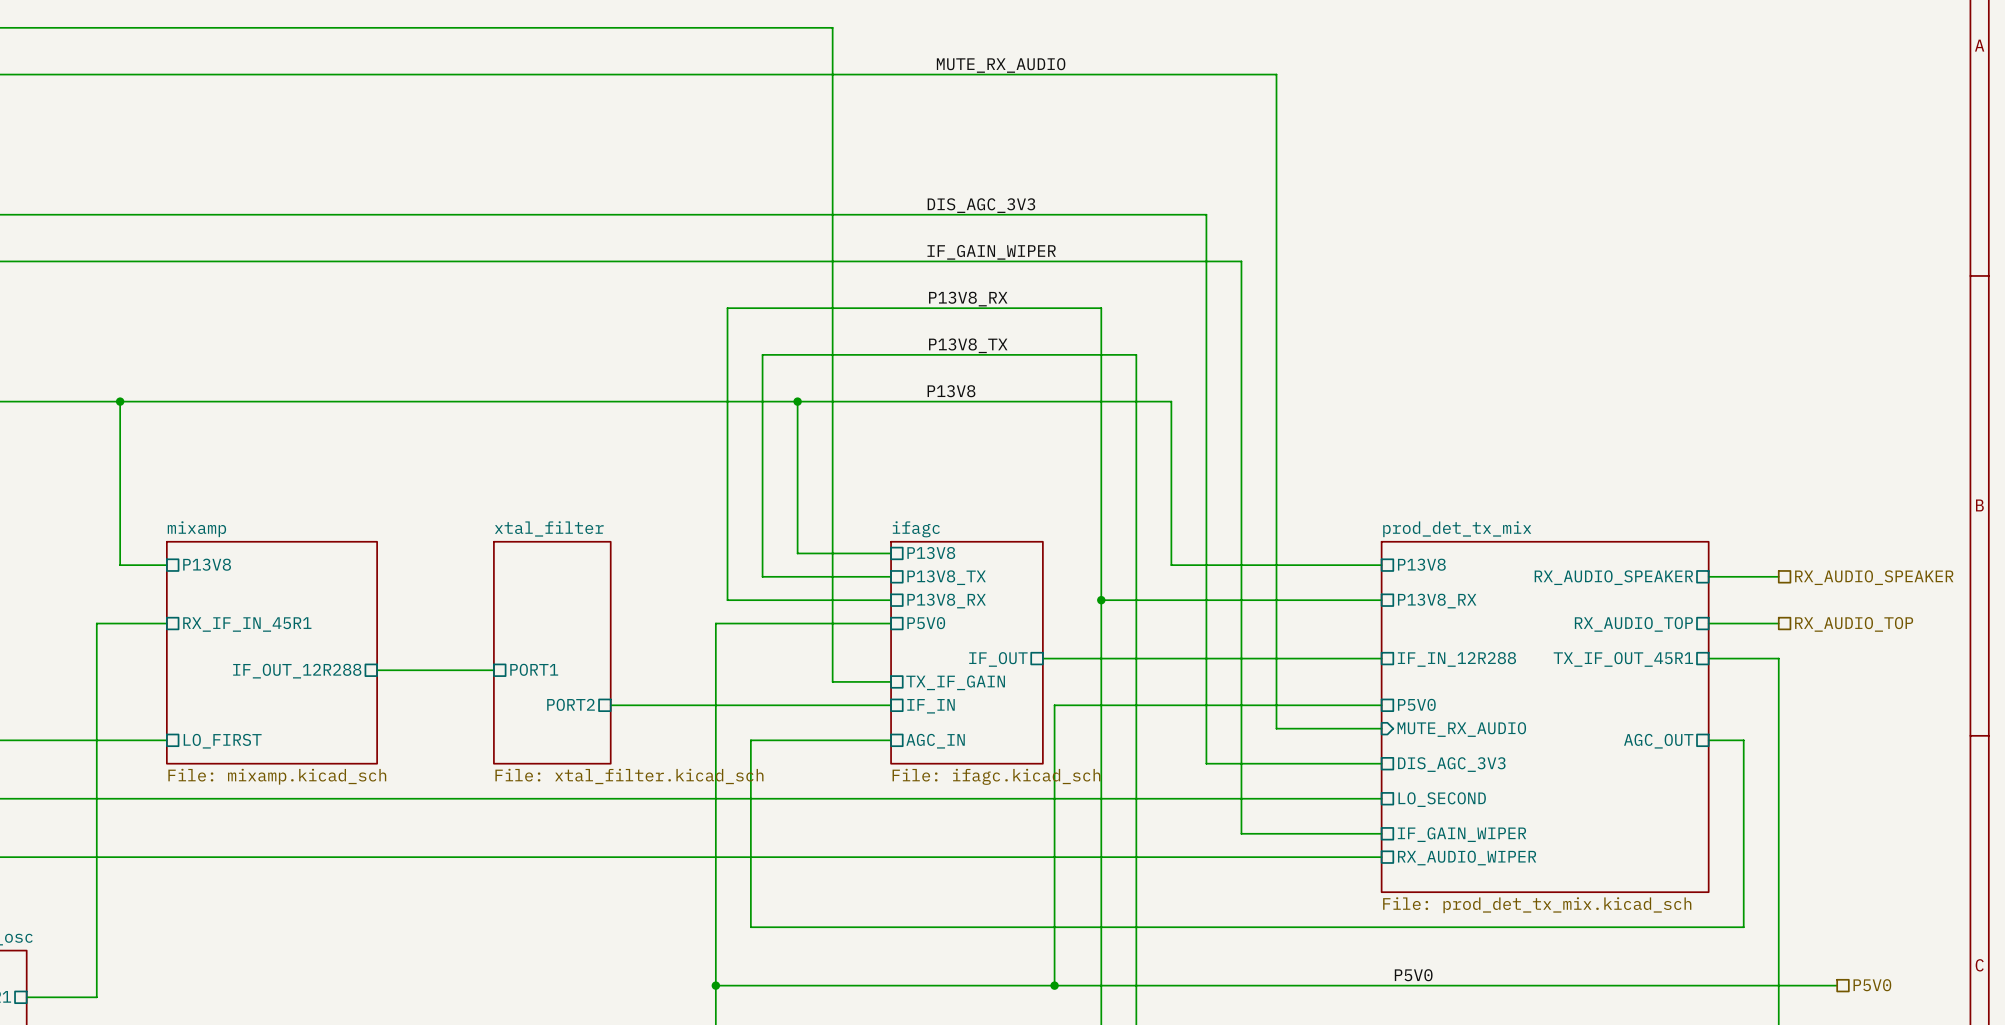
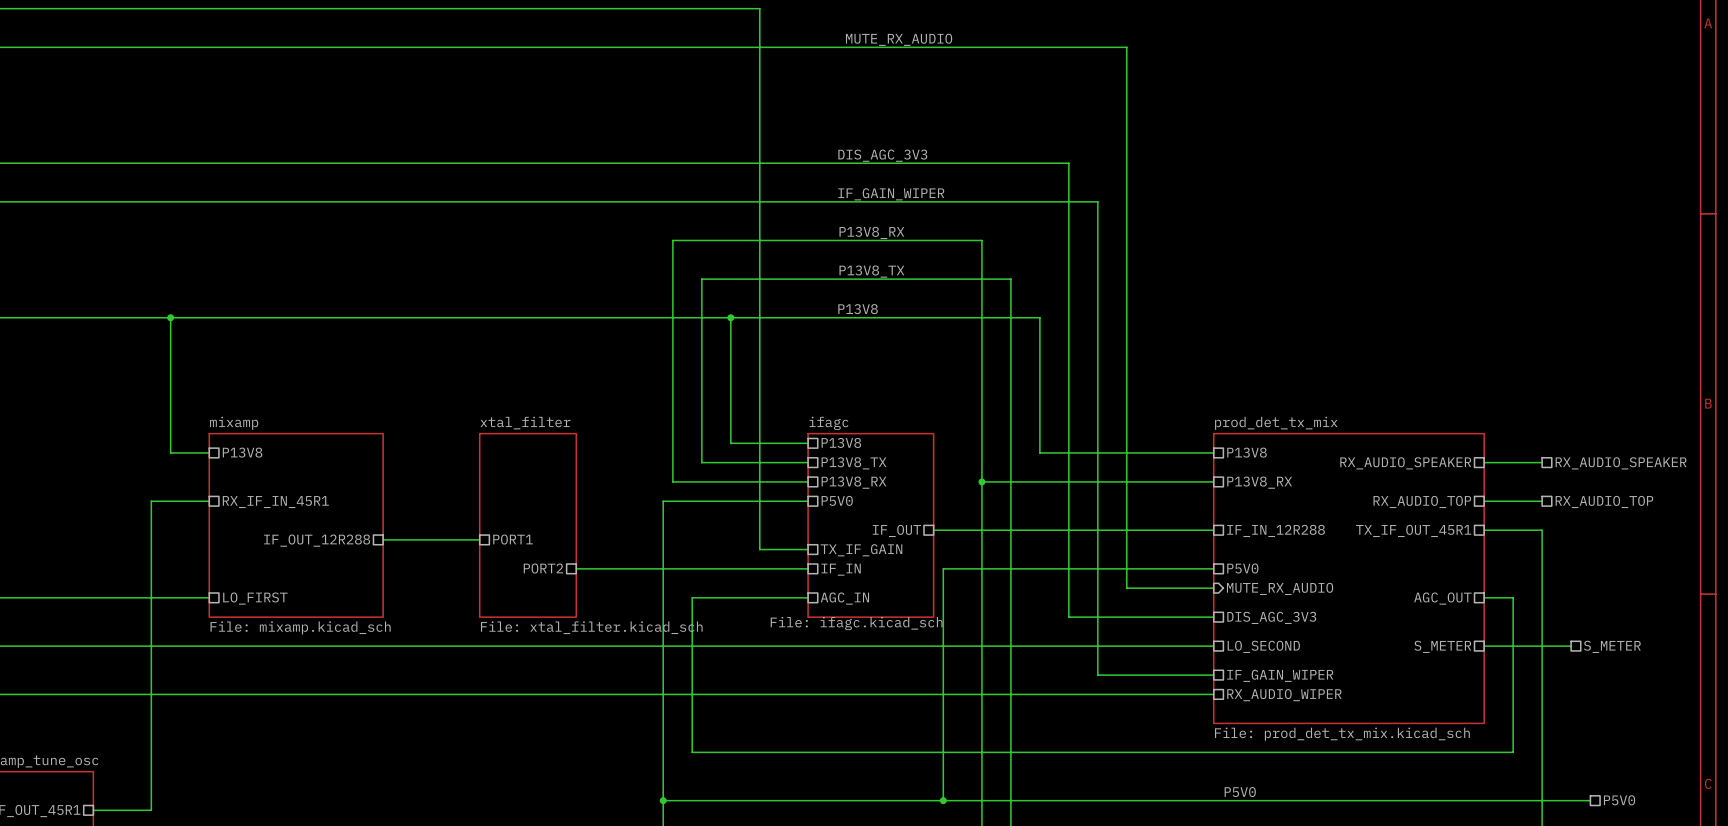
sheet ifagc value position: File: ifagc.kicad_sch (996, 776) -> File: ifagc.kicad_sch (856, 623)
wire: none -> (1484, 646) (1571, 646)
sheet pin: none -> S_METER (1442, 646)
hierarchical label: none -> S_METER (1612, 646)

